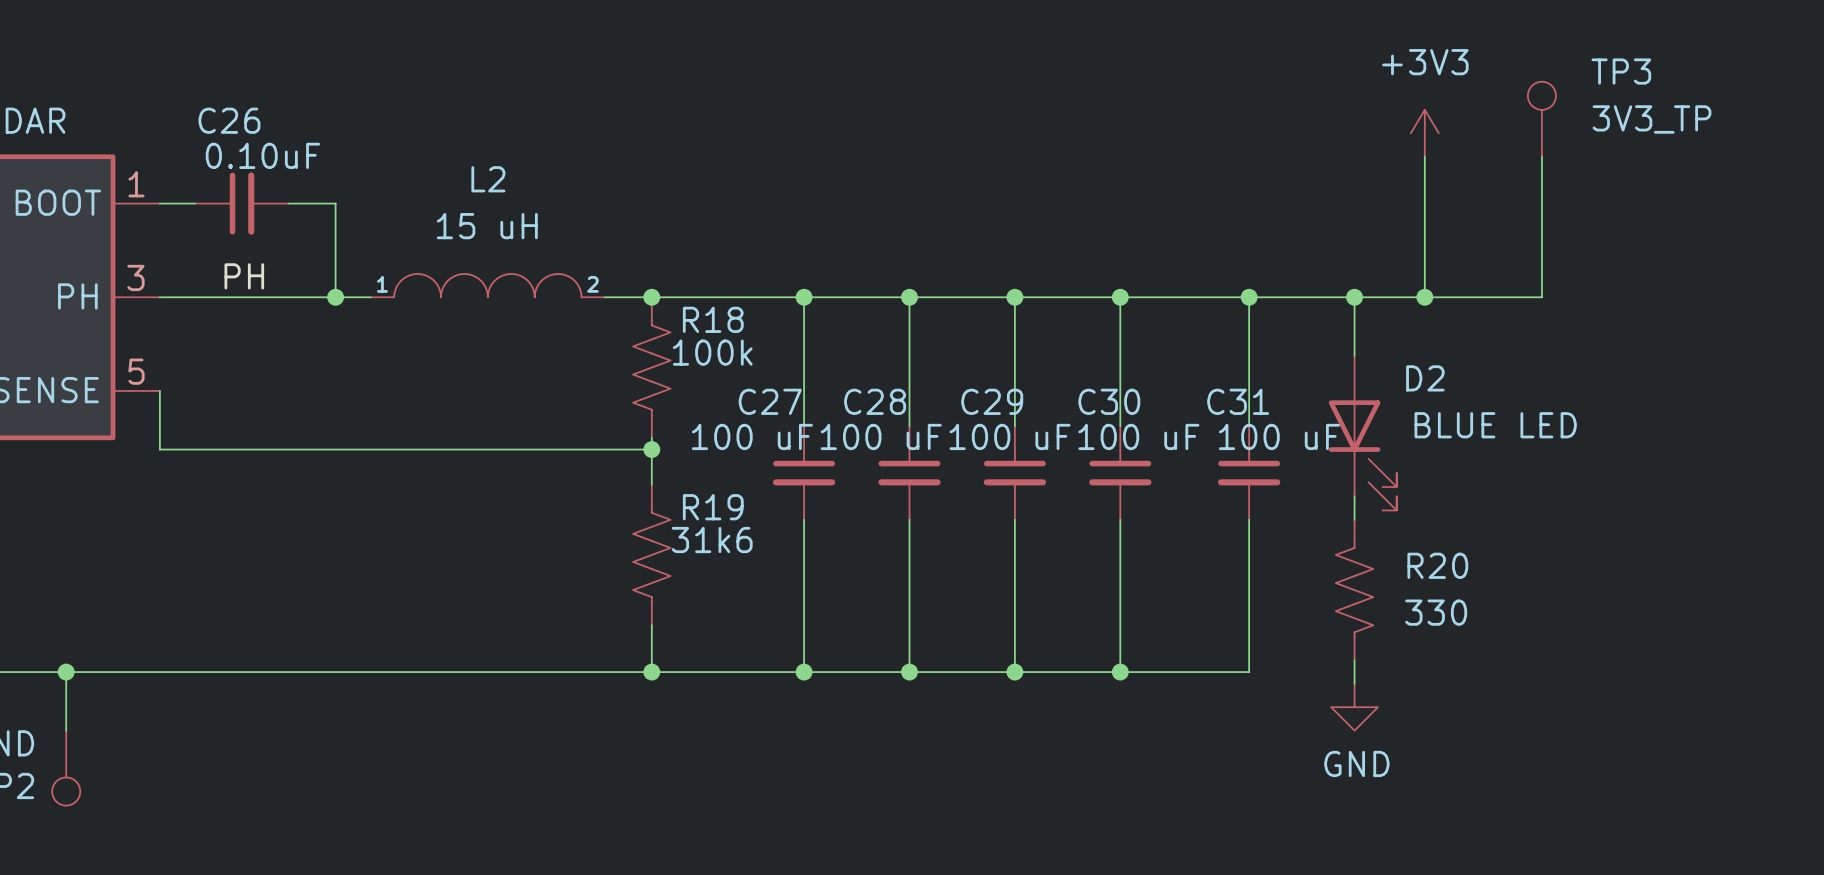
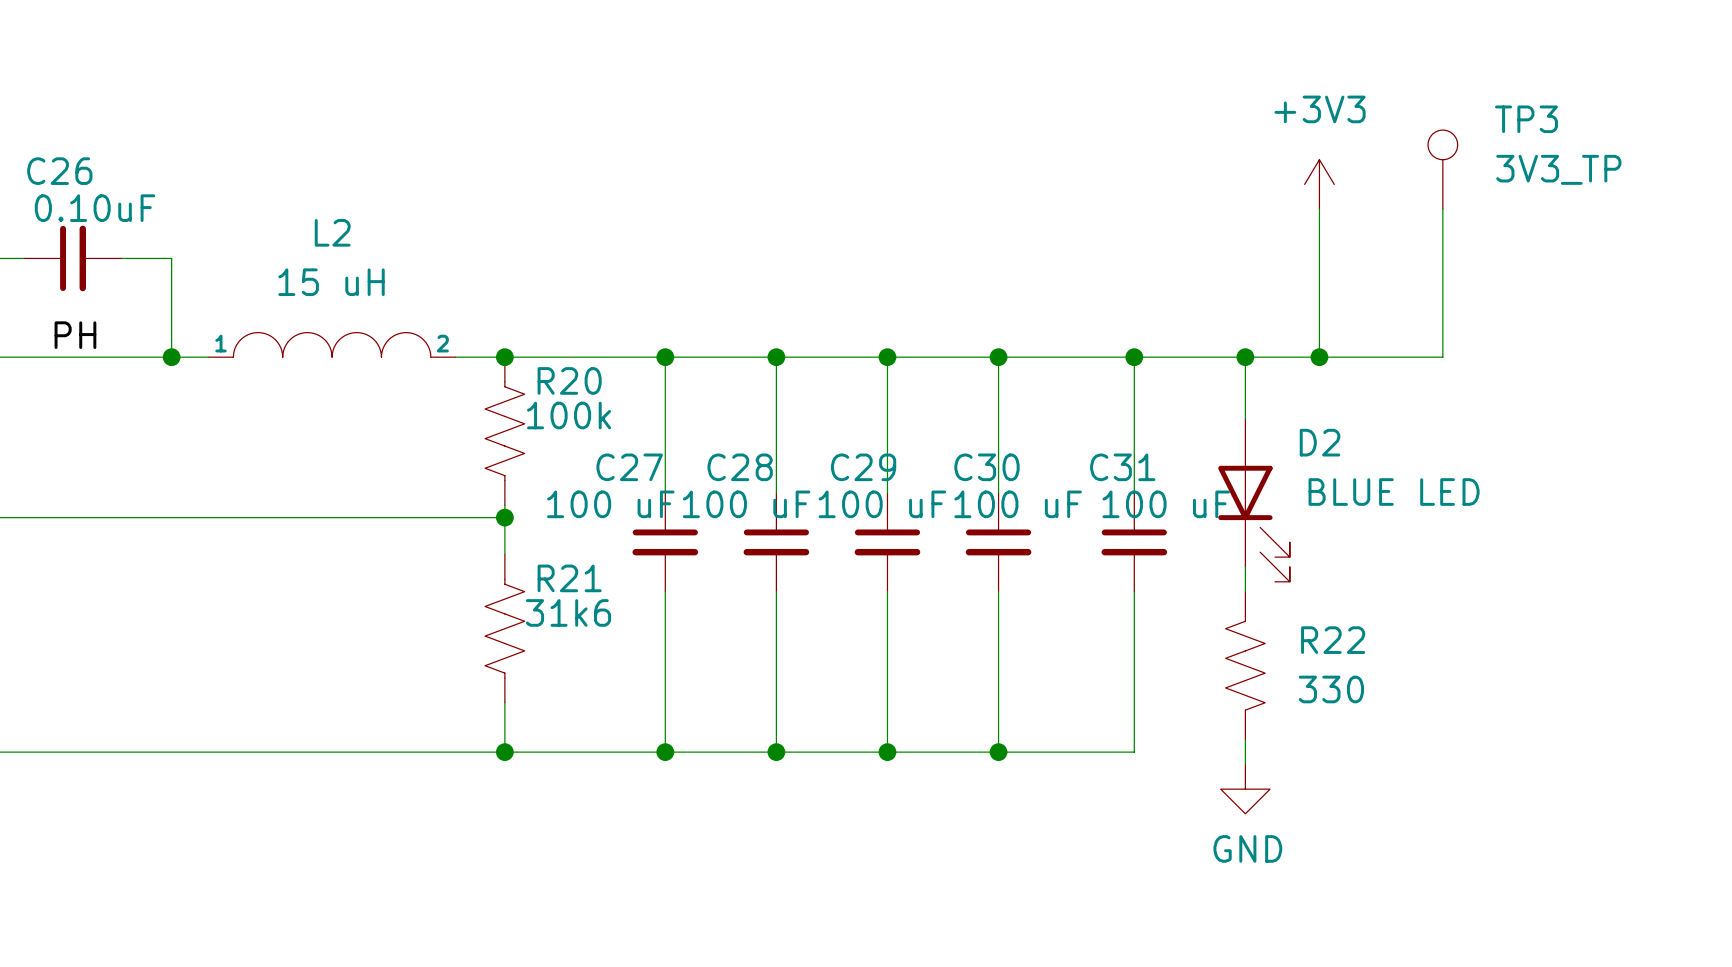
R18 name: R18 (713, 319) -> R20 (569, 380)
R19 name: R19 (713, 507) -> R21 (569, 578)
R20 name: R20 (1437, 565) -> R22 (1333, 640)

